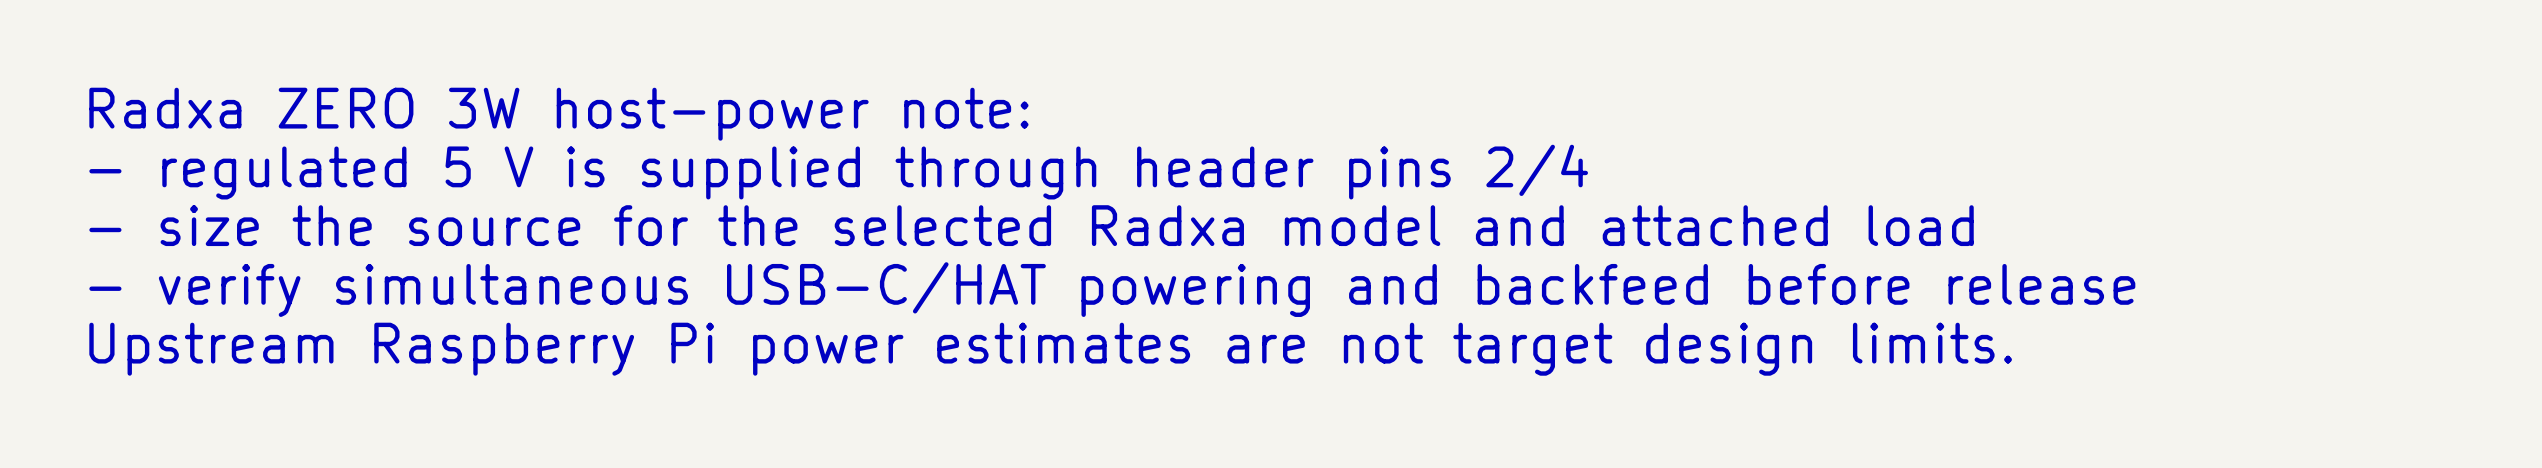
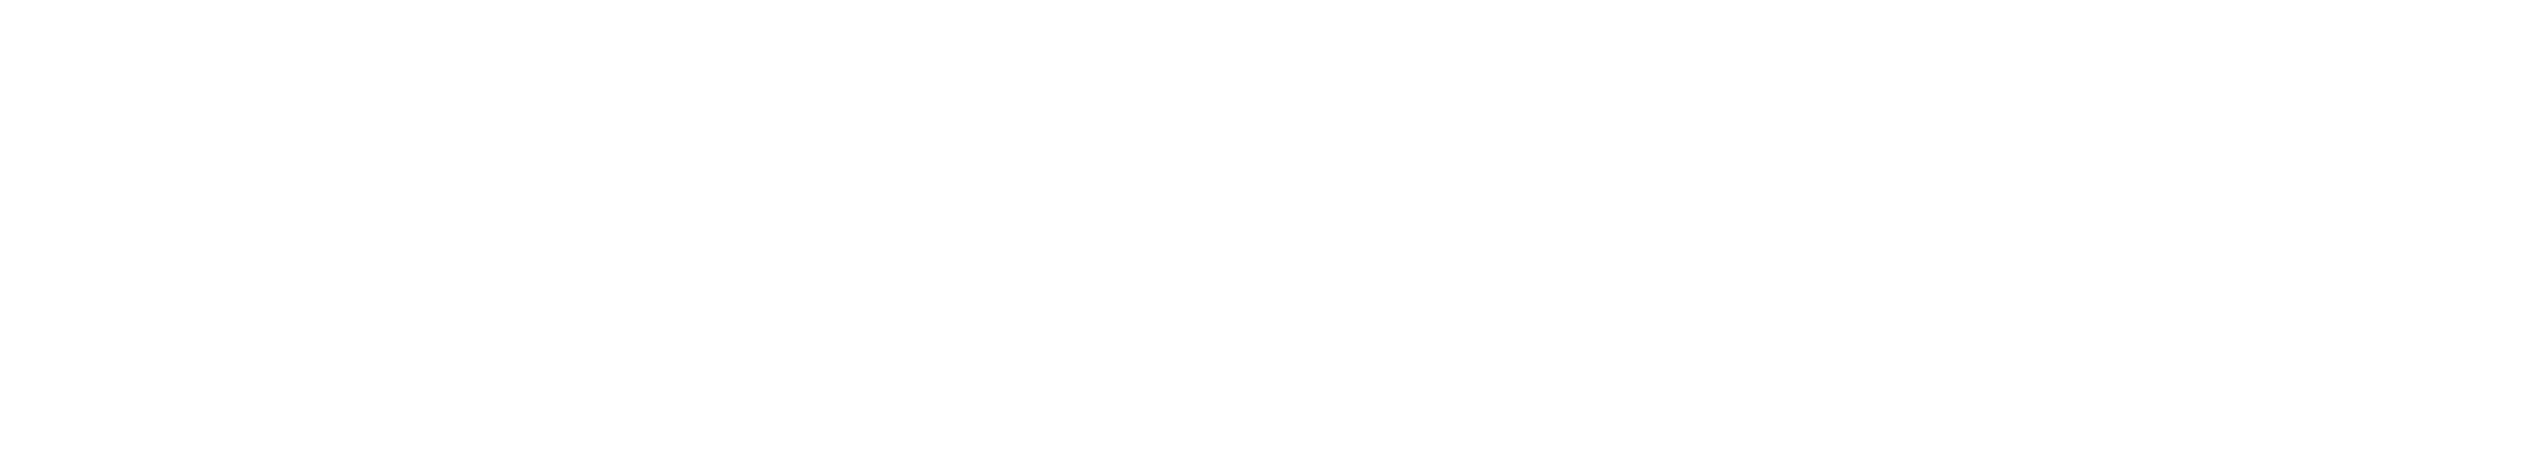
text: Radxa ZERO 3W host-power note: (558, 114) -> none
text: - regulated 5 V is supplied through header pins 2/4 (838, 172) -> none
text: - size the source for the selected Radxa model and attached load (1031, 225) -> none
text: - verify simultaneous USB-C/HAT powering and backfeed before release (1112, 289) -> none
text: Upstream Raspberry Pi power estimates are not target design limits. (1050, 349) -> none

